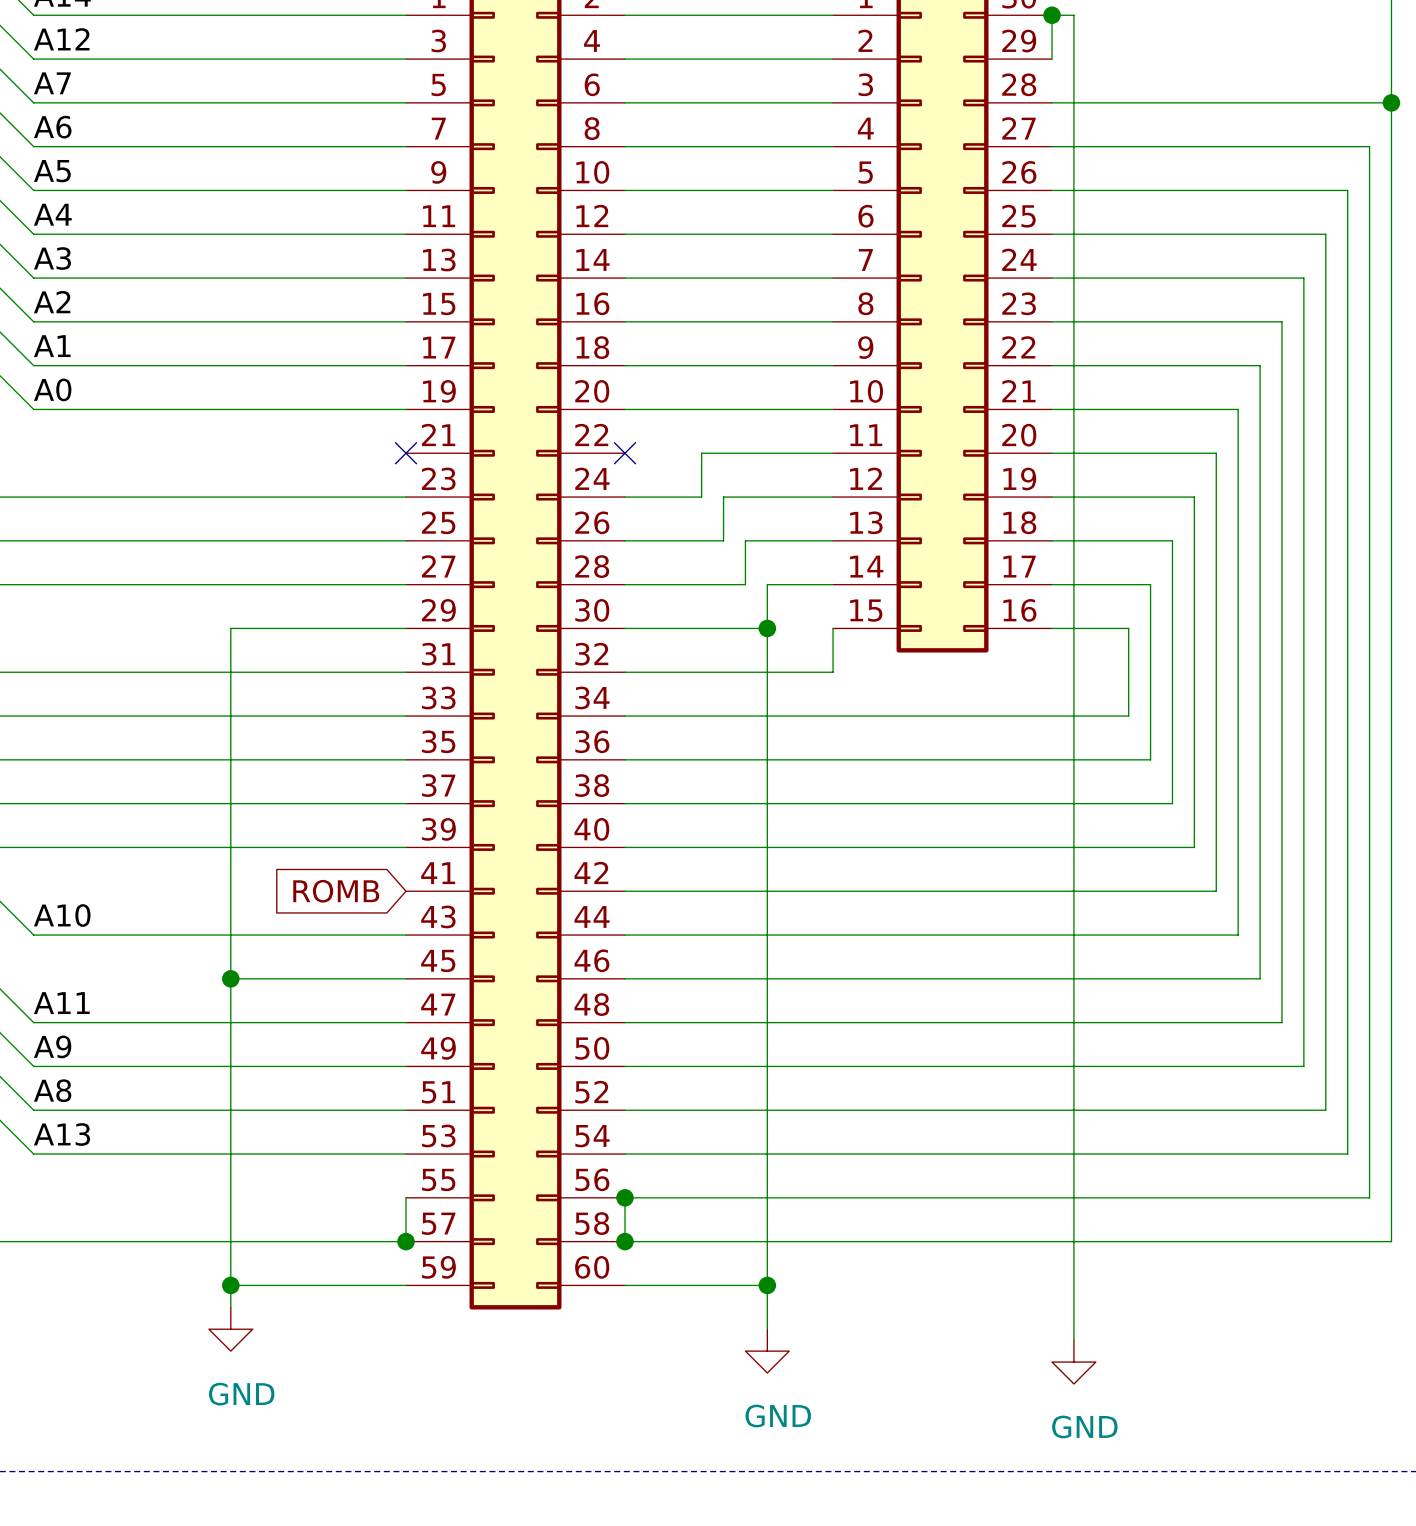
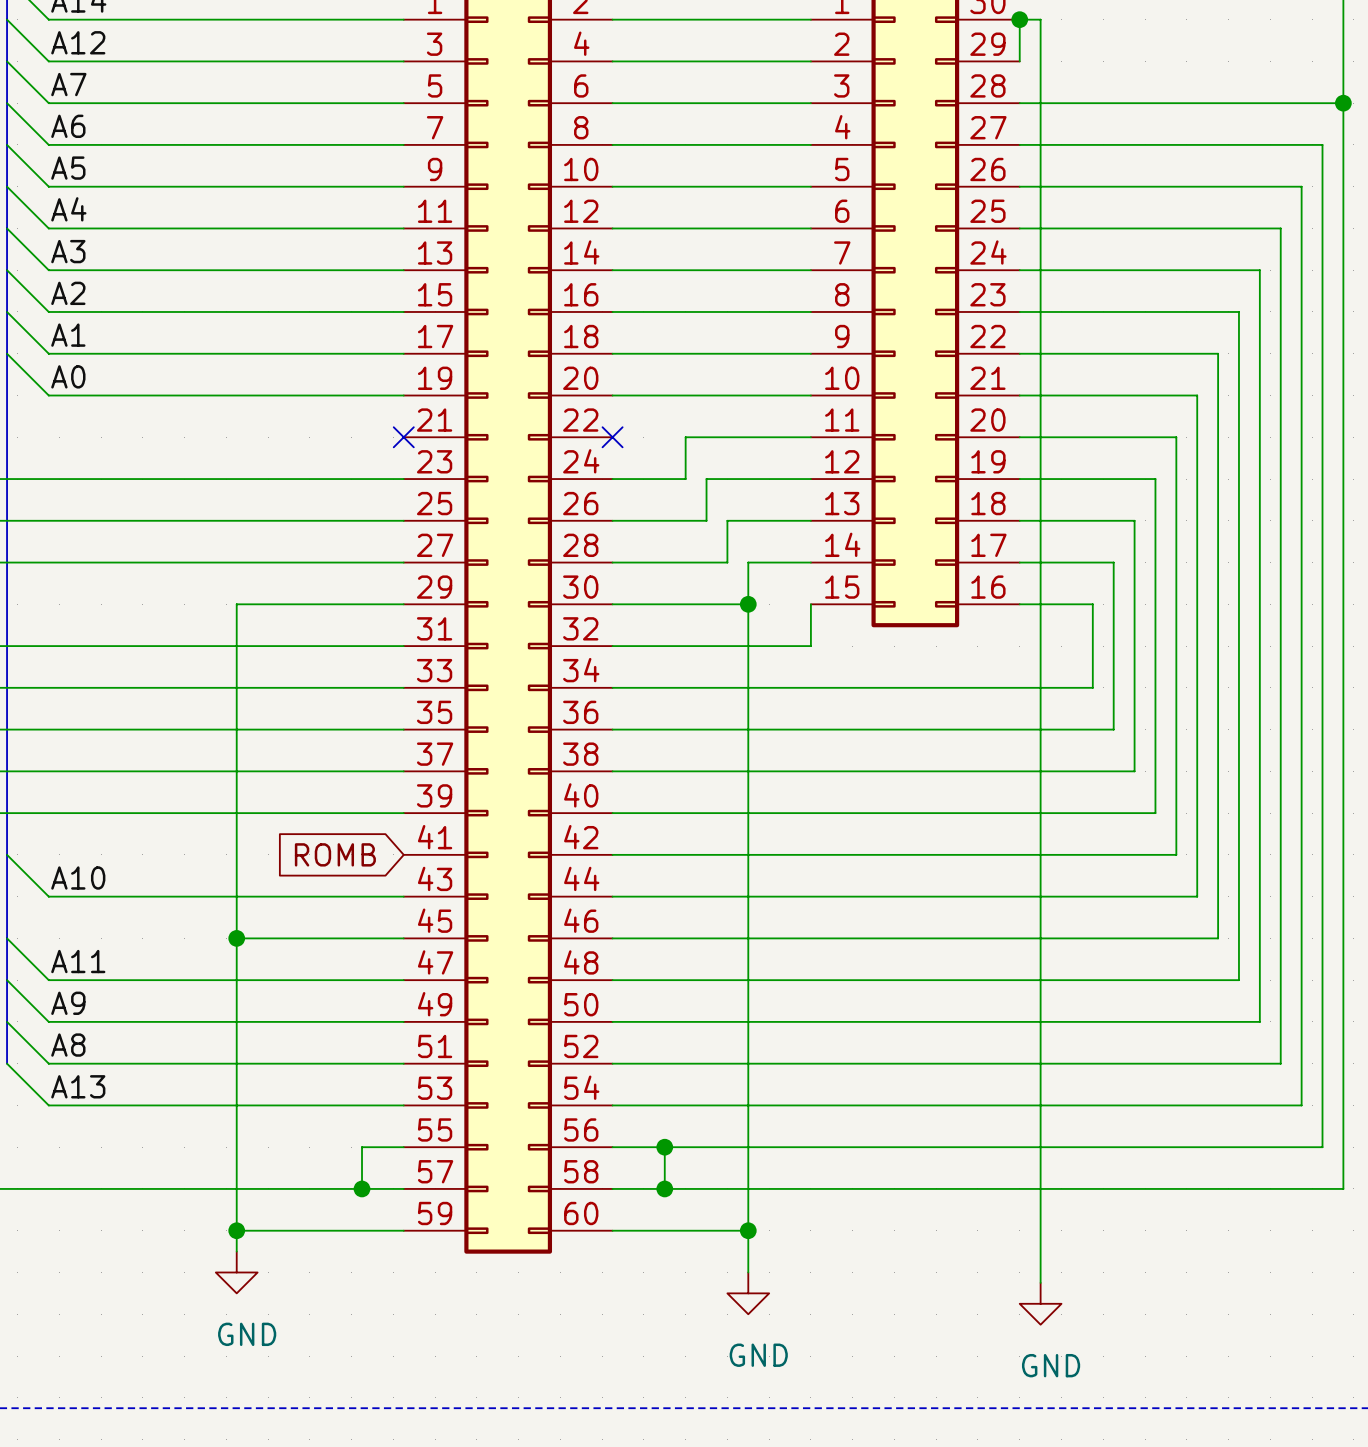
wire: (406, 1197) (406, 1241) -> (403, 1147) (362, 1147) (362, 1188)
wire: (624, 1197) (624, 1241) -> (664, 1147) (664, 1188)
junction: (624, 1197) -> none
junction: none -> (664, 1147)
junction position: (406, 1241) -> (362, 1188)
junction: (624, 1241) -> none
junction: none -> (664, 1188)

